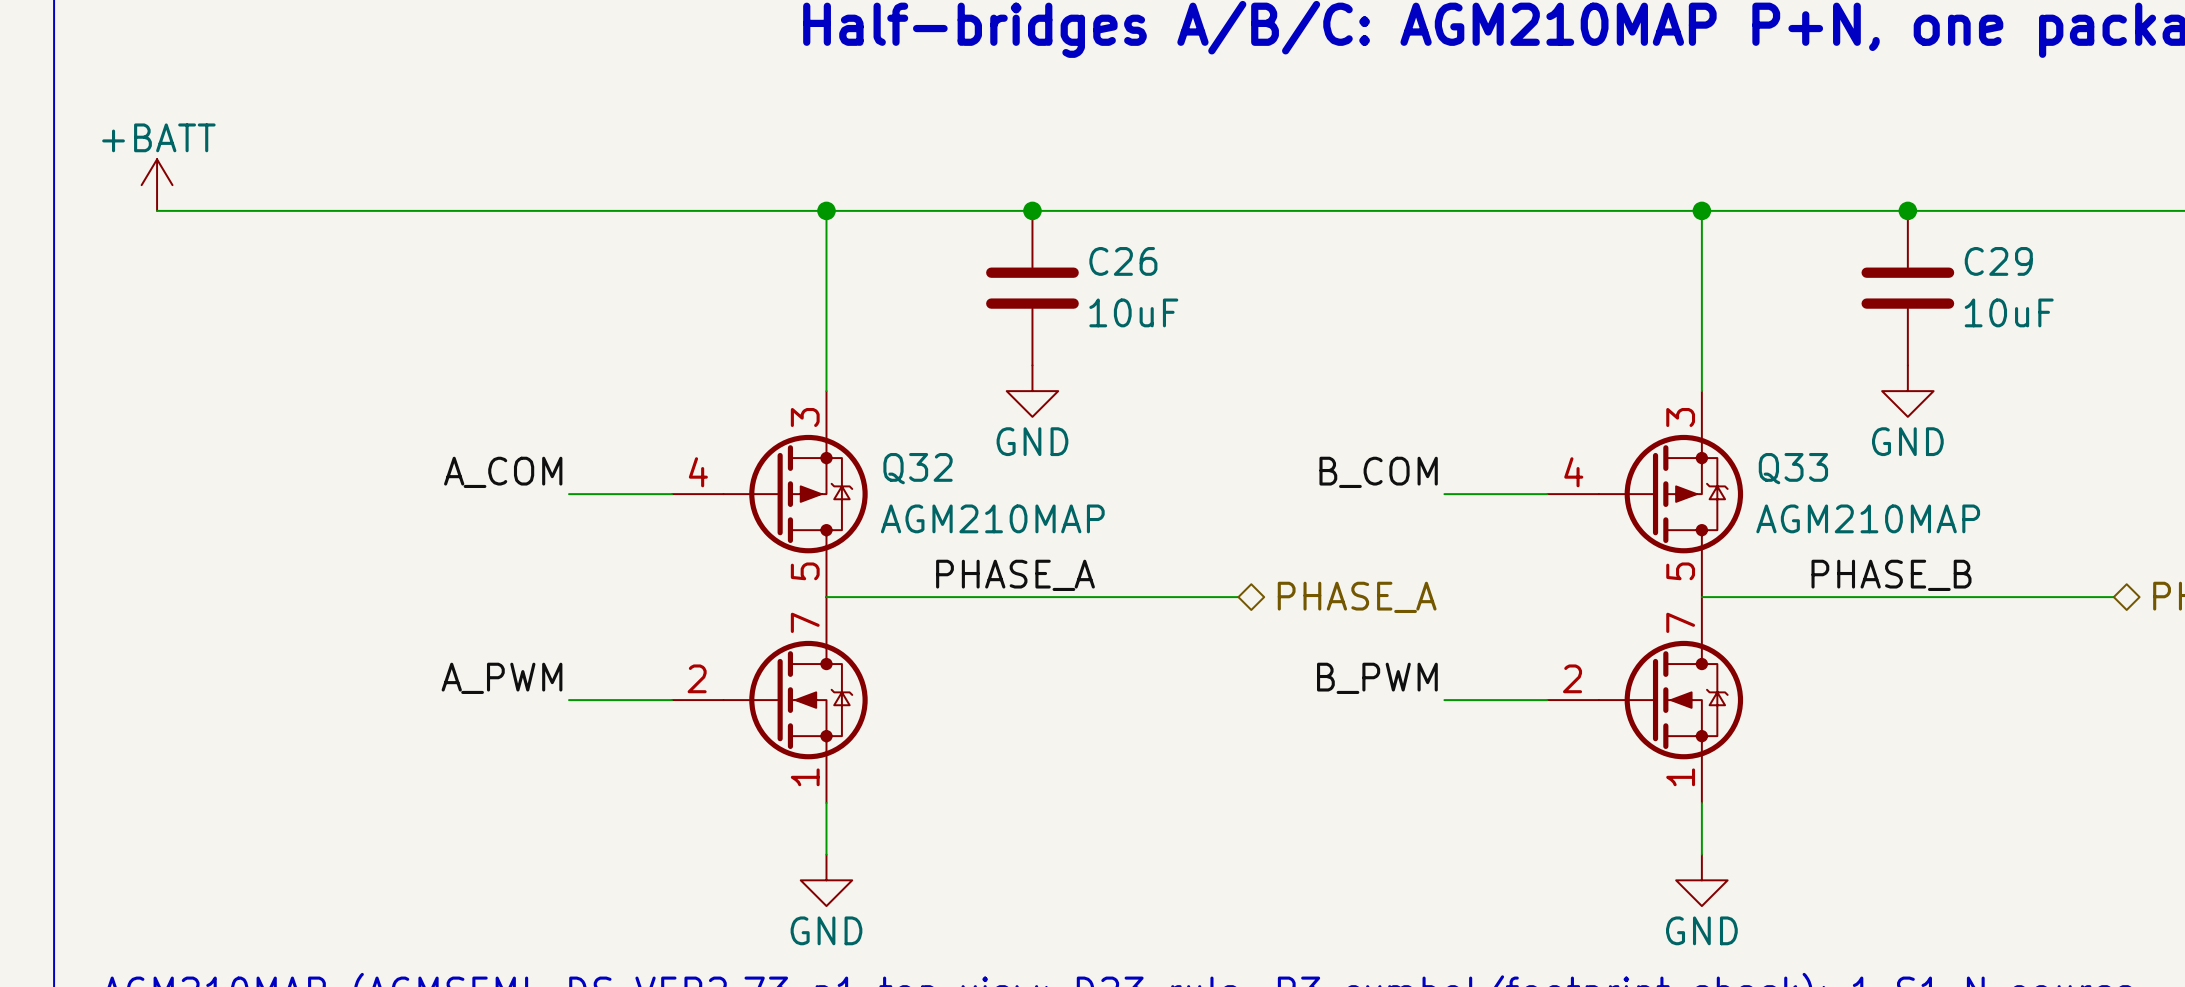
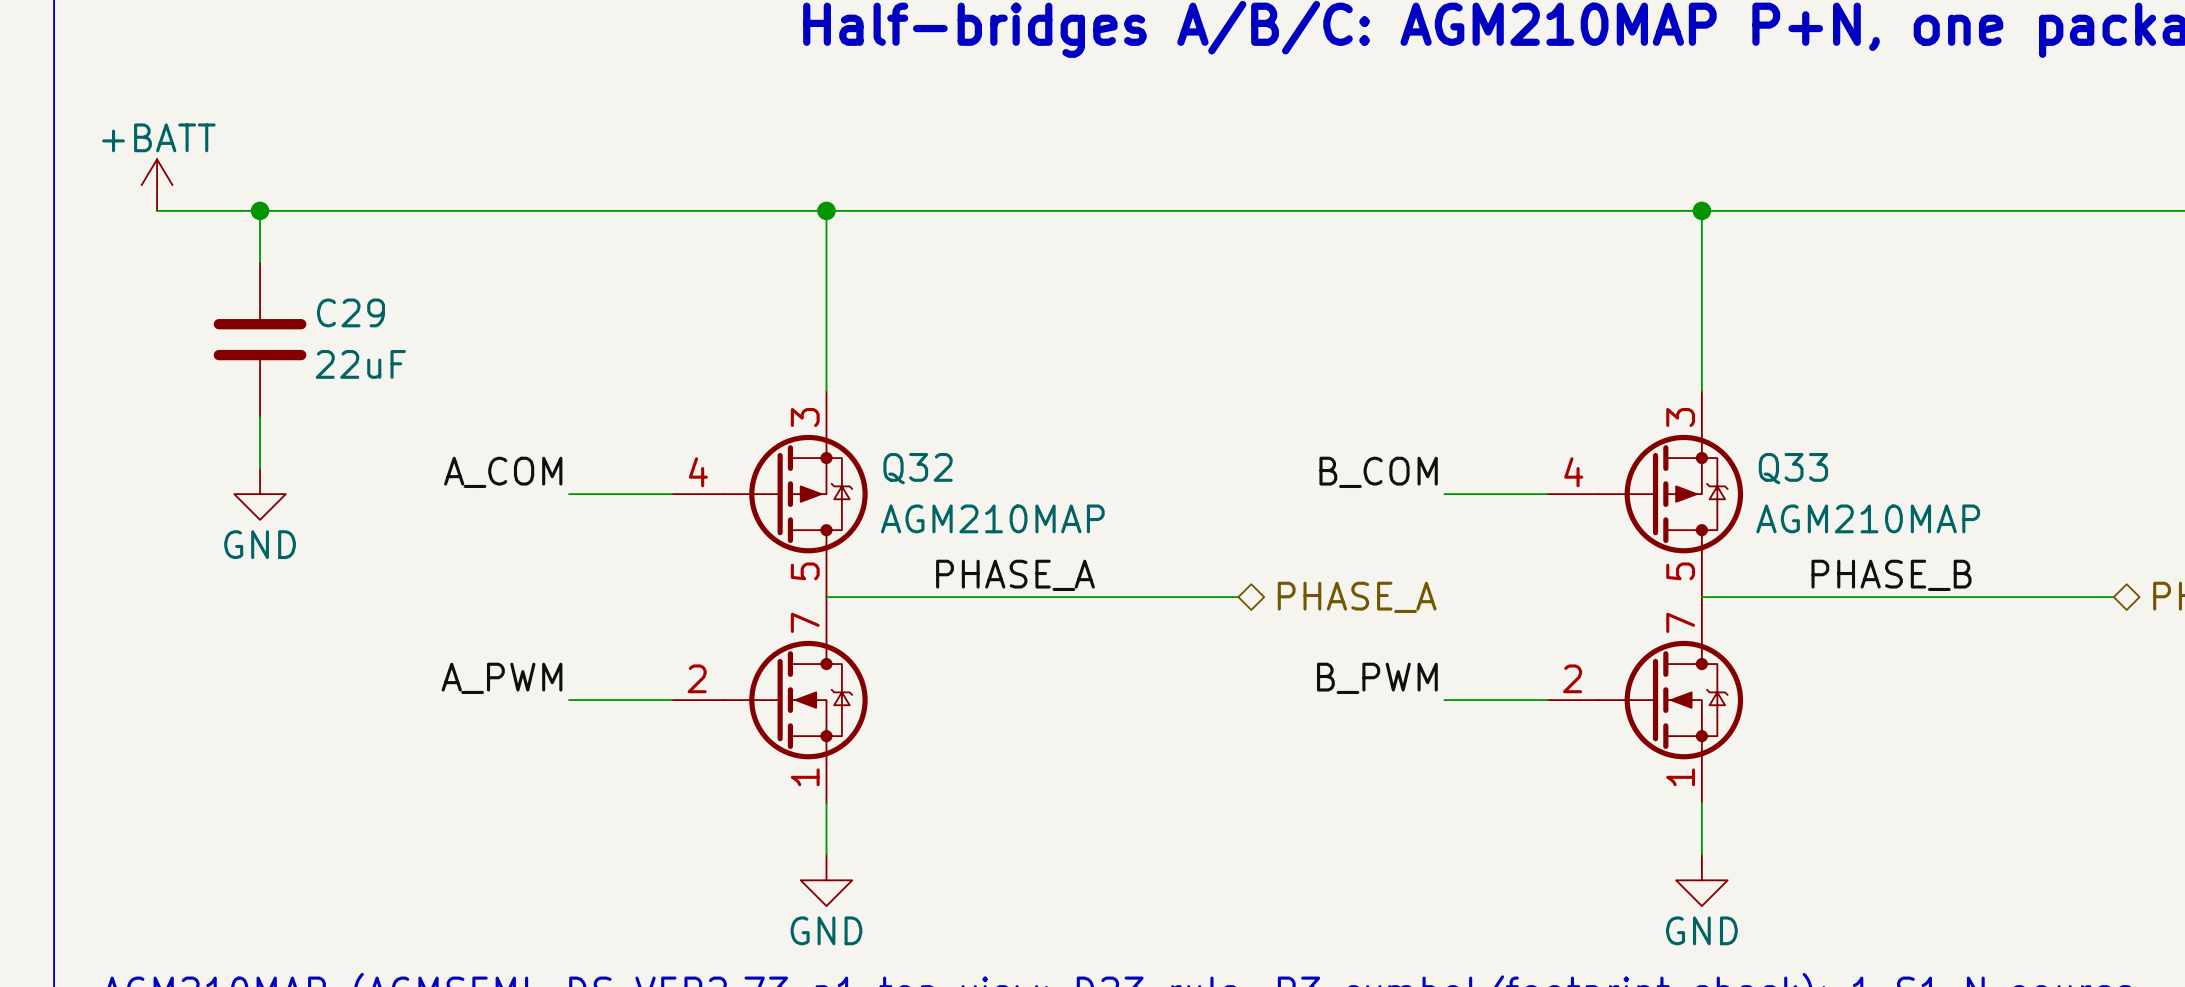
wire: none -> (260, 210) (260, 262)
junction: none -> (260, 210)
junction: (1032, 210) -> none
junction: (1907, 210) -> none
C26: 10uF (1032, 288) -> none
C29 position: (1907, 288) -> (260, 339)
C29 value: 10uF (2009, 312) -> 22uF (360, 364)
power symbol: GND (1032, 391) -> none
power symbol: GND (1907, 391) -> none
wire: none -> (260, 416) (260, 468)
power symbol: none -> GND (260, 494)

